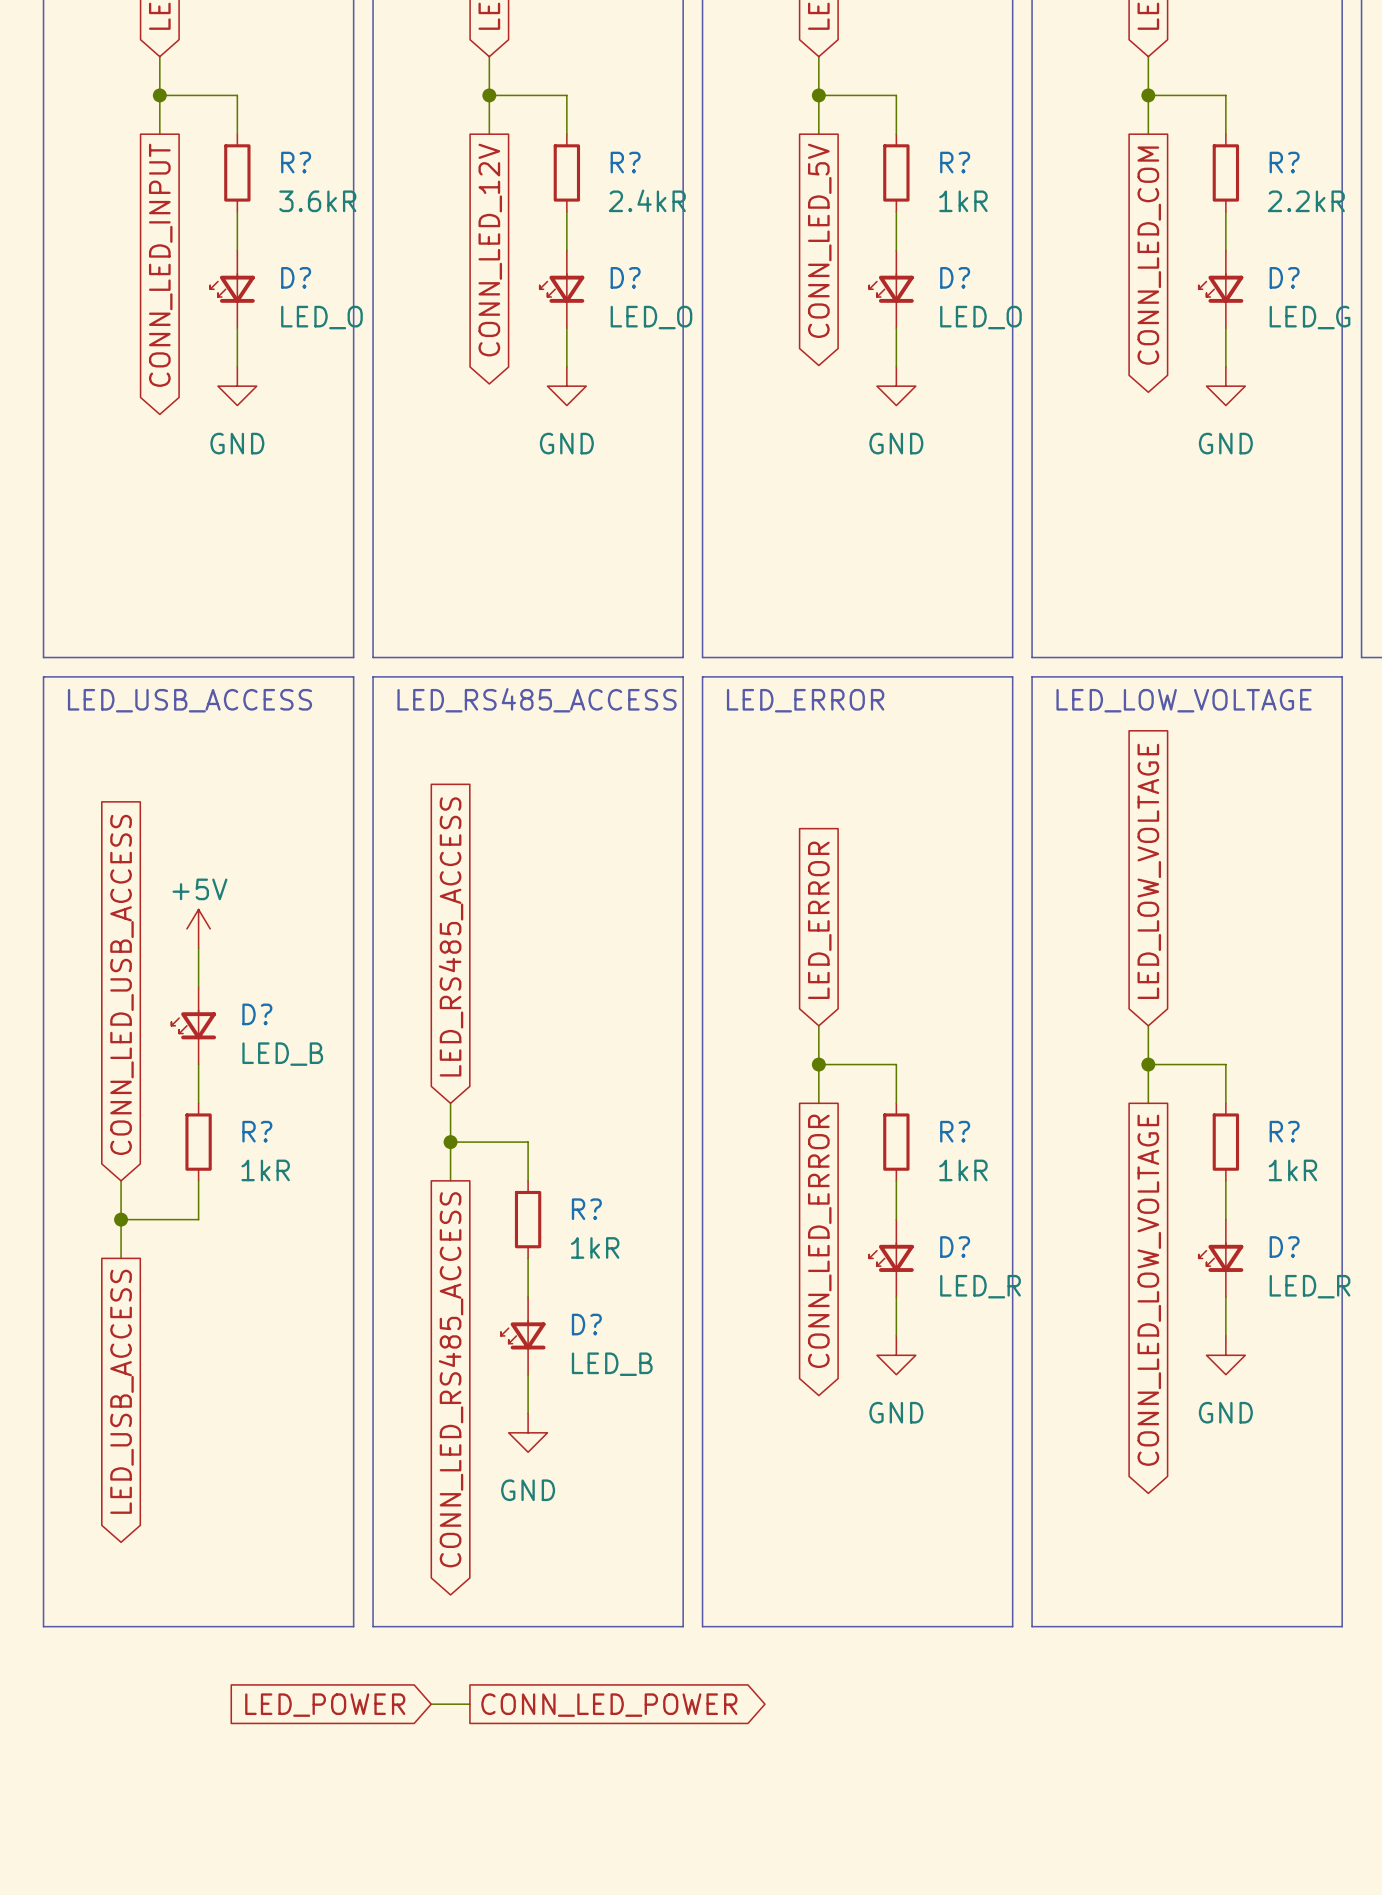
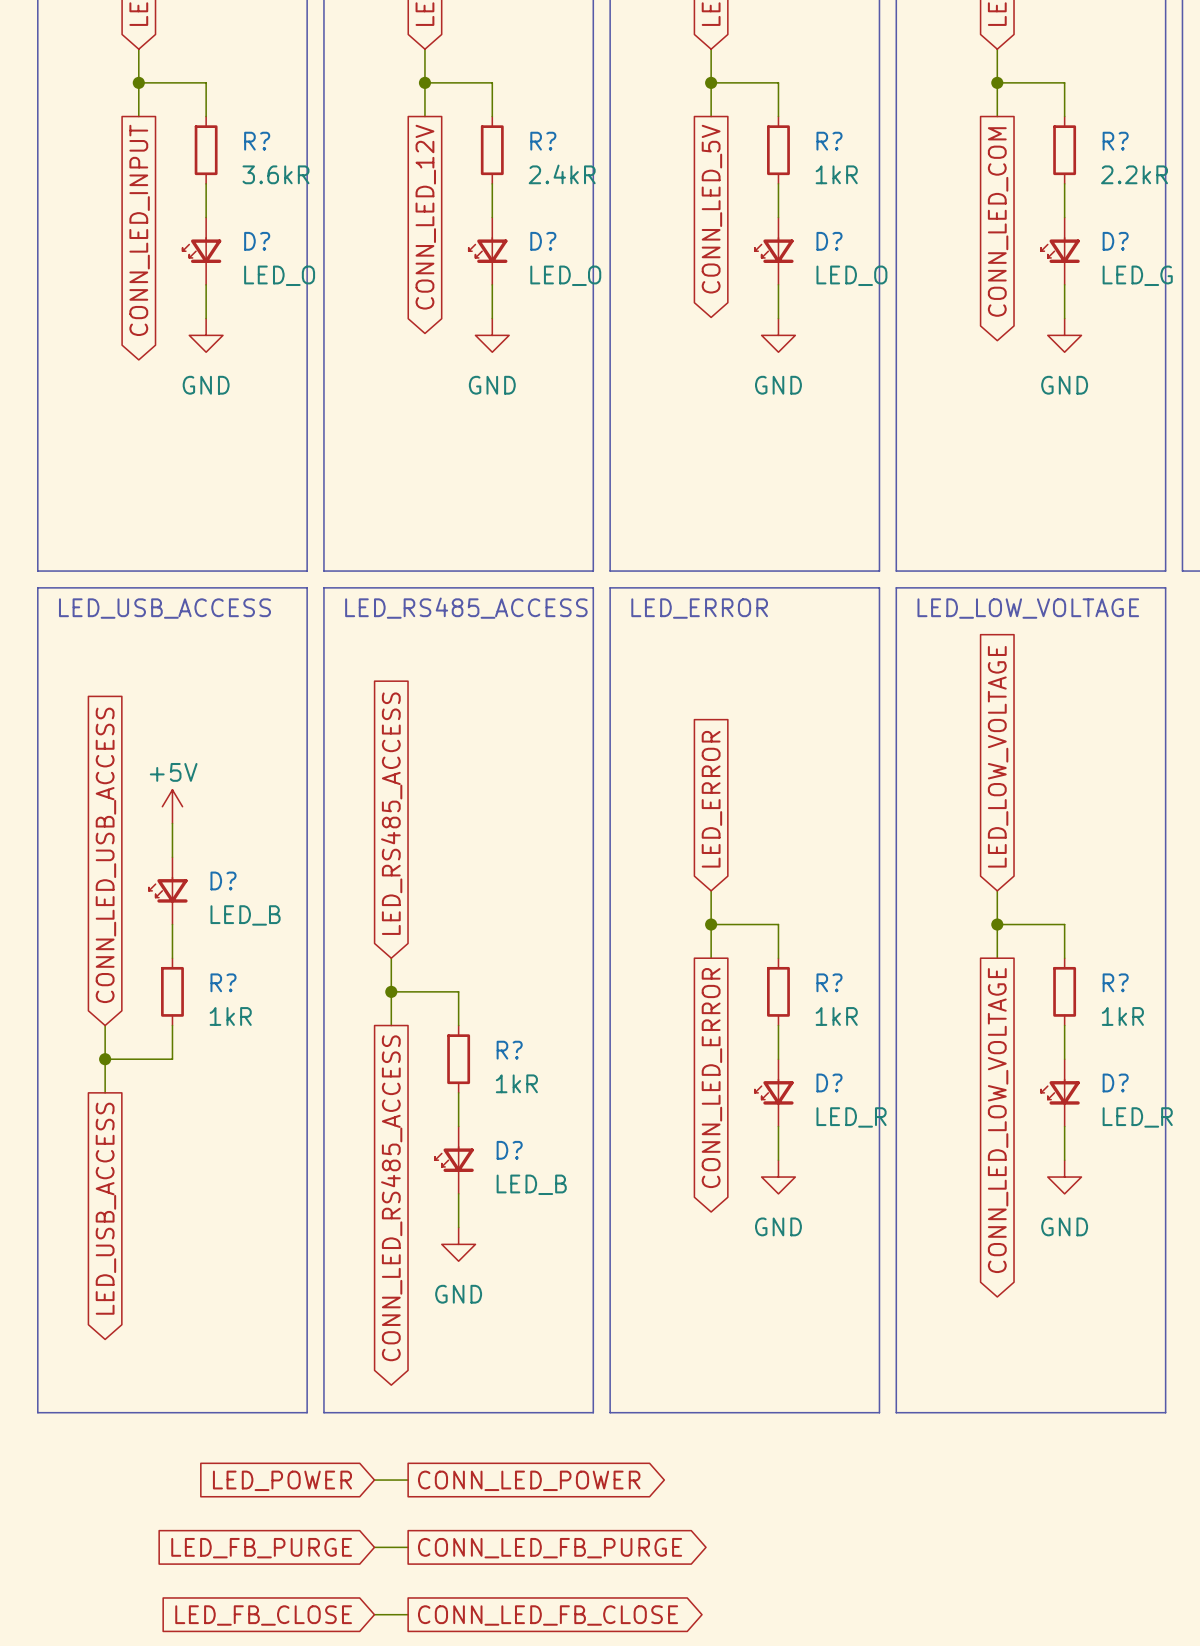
wire: none -> (374, 1547) (408, 1547)
global label: none -> LED_FB_PURGE (261, 1548)
global label: none -> CONN_LED_FB_PURGE (550, 1548)
wire: none -> (374, 1614) (408, 1614)
global label: none -> LED_FB_CLOSE (263, 1615)
global label: none -> CONN_LED_FB_CLOSE (548, 1615)

